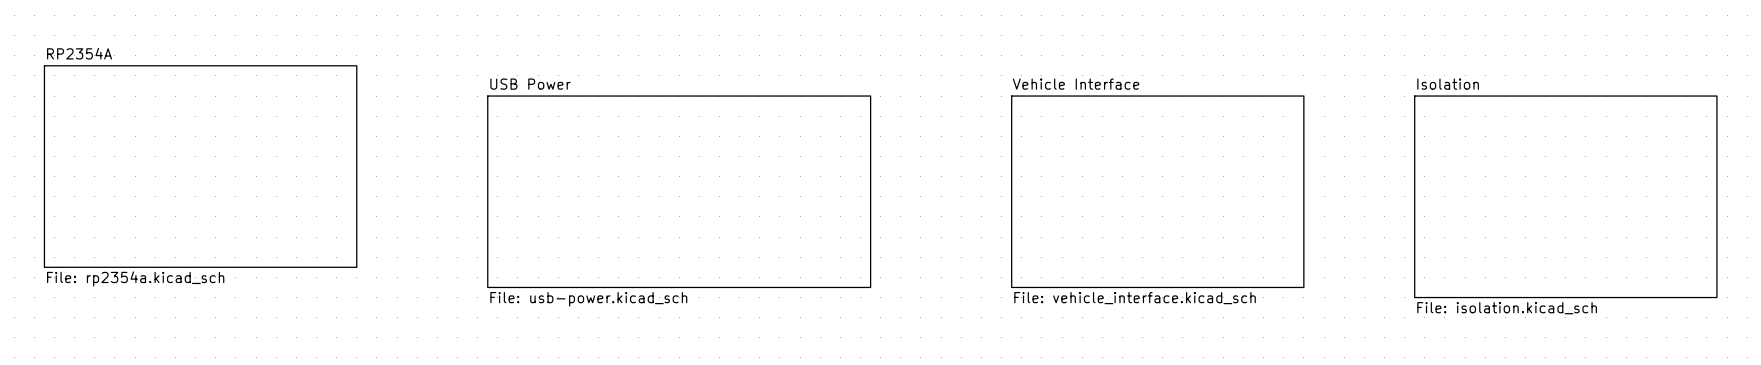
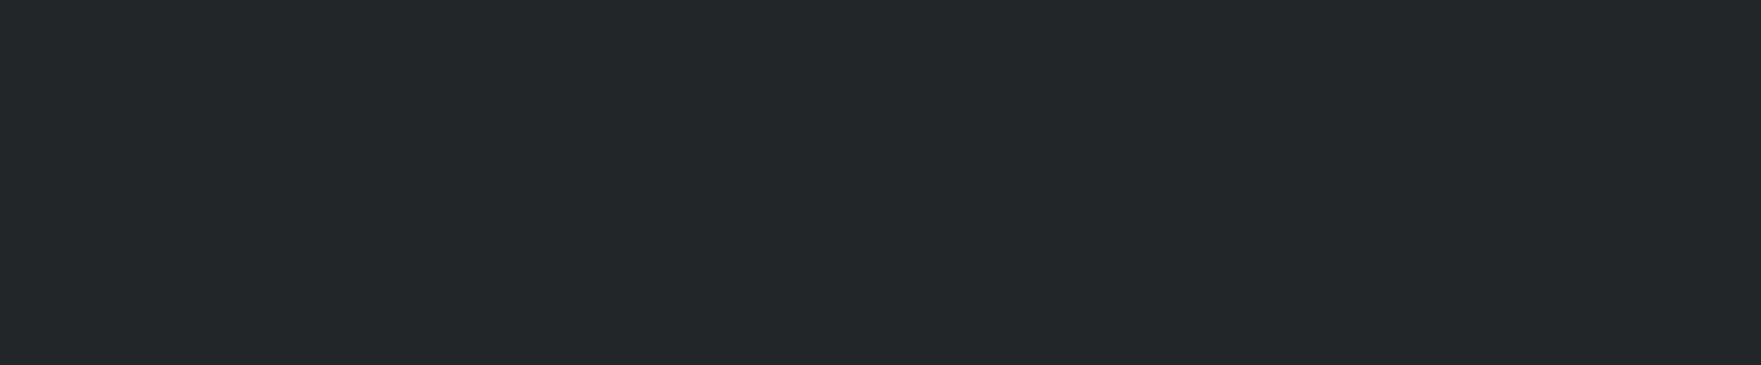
sheet RP2354A: File: rp2354a.kicad_sch (200, 166) -> none
sheet USB Power: File: usb-power.kicad_sch (679, 191) -> none
sheet Vehicle Interface: File: vehicle_interface.kicad_sch (1157, 191) -> none
sheet Isolation: File: isolation.kicad_sch (1565, 196) -> none

